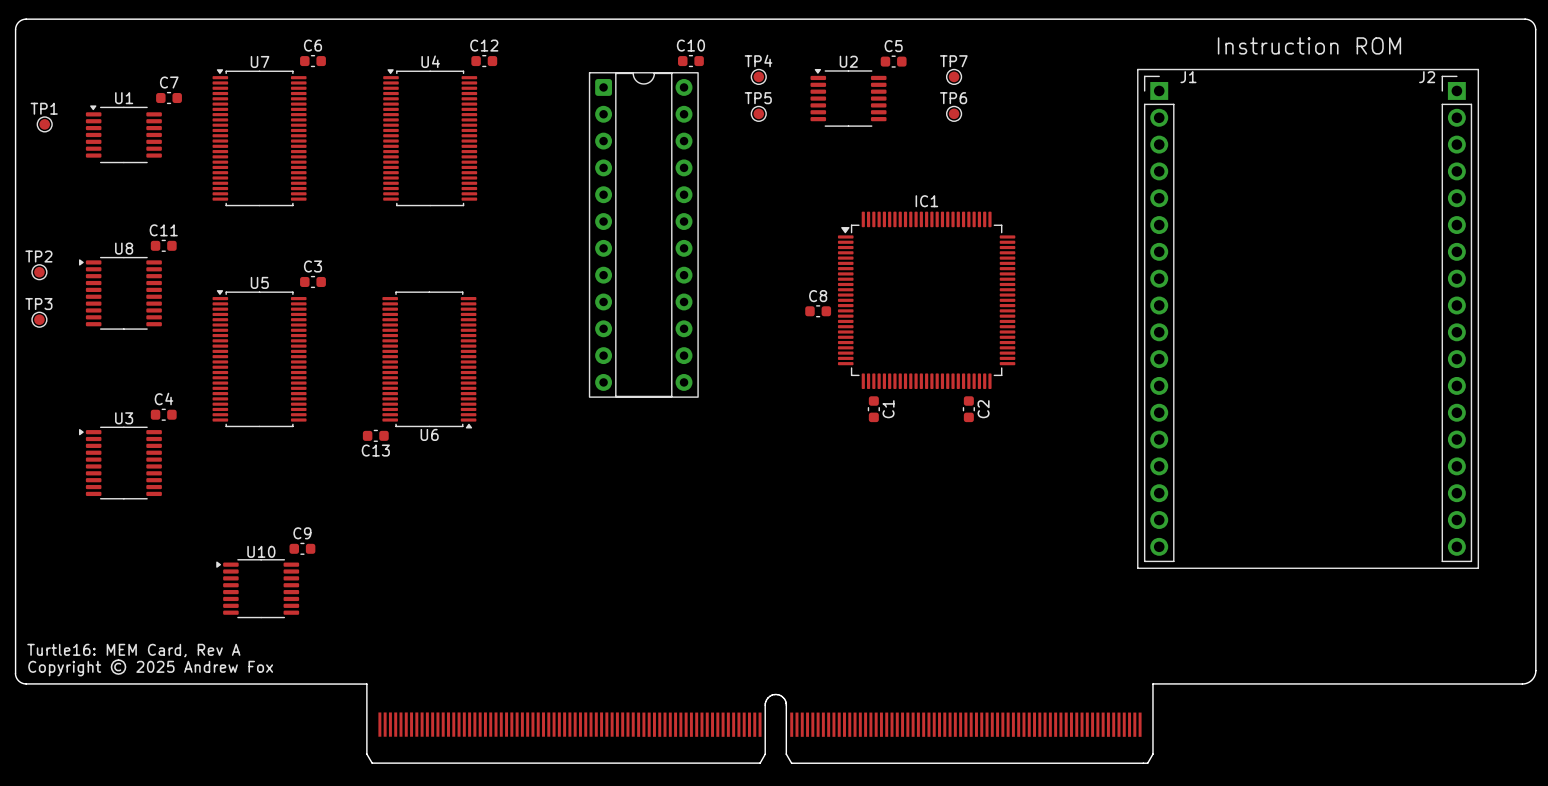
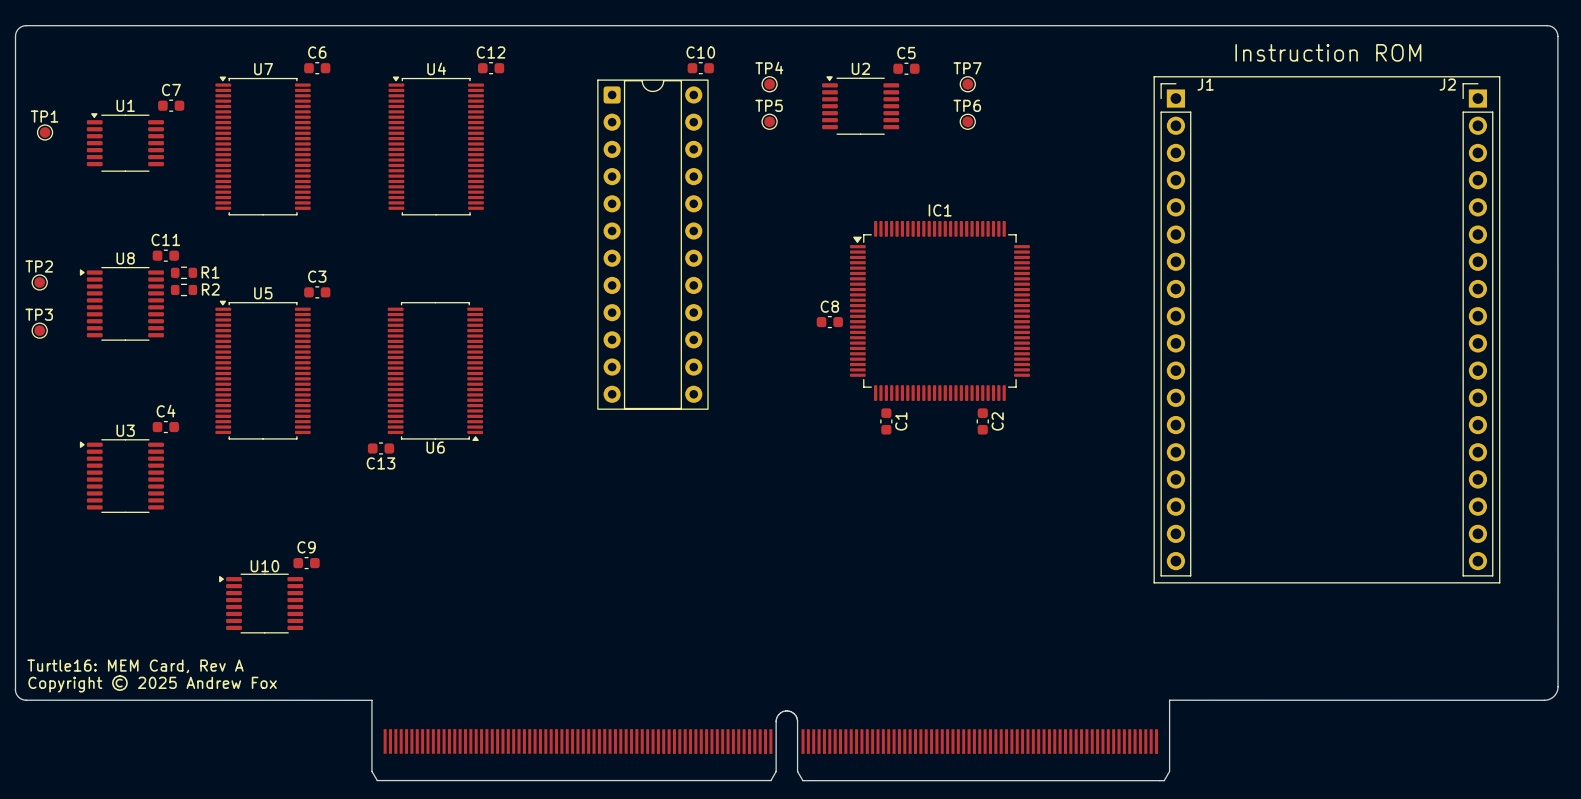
R1: none -> (184, 272)
R2: none -> (184, 289)

